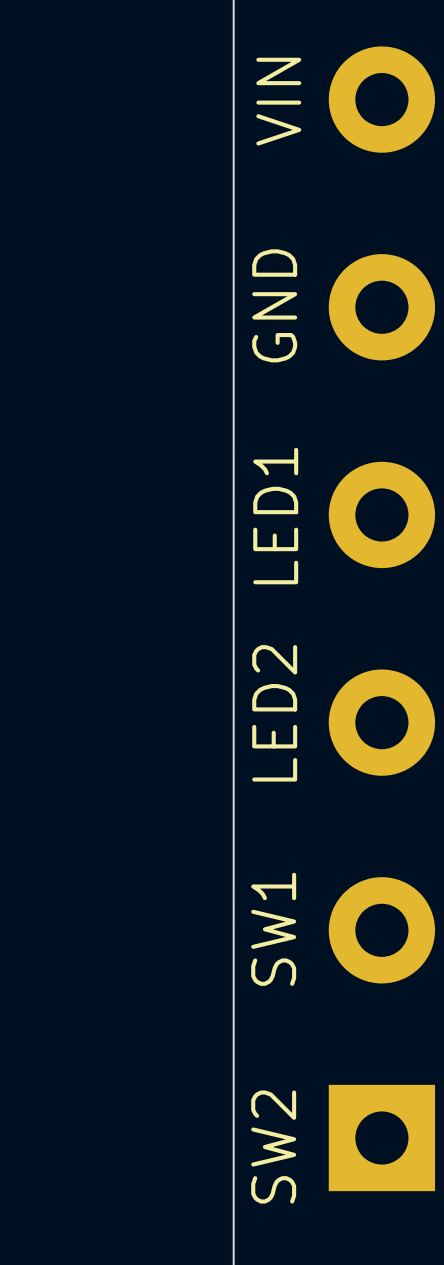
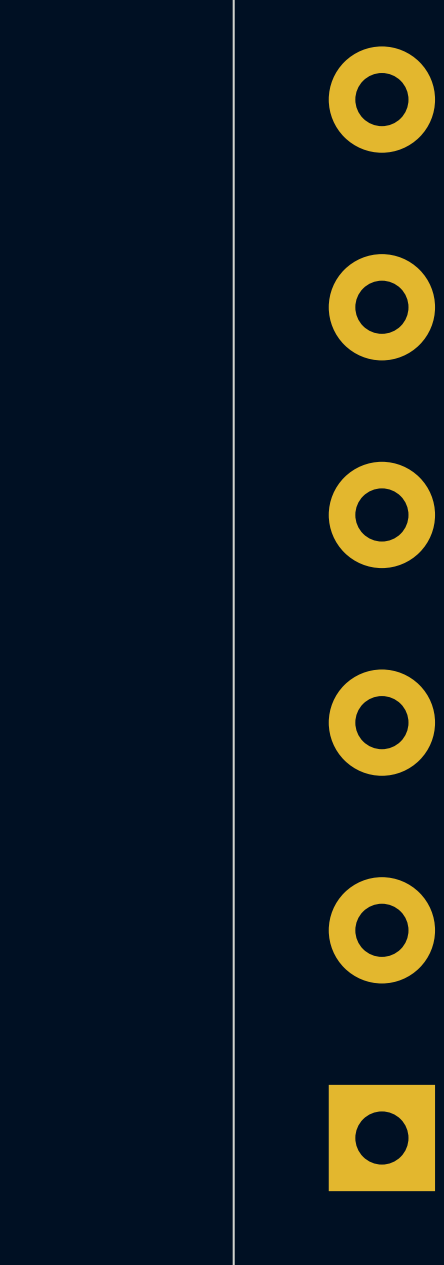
text: VIN (278, 101) -> none
text: GND (274, 305) -> none
text: LED1 (275, 516) -> none
text: LED2 (274, 713) -> none
text: SW1 (273, 929) -> none
text: SW2 (273, 1147) -> none

